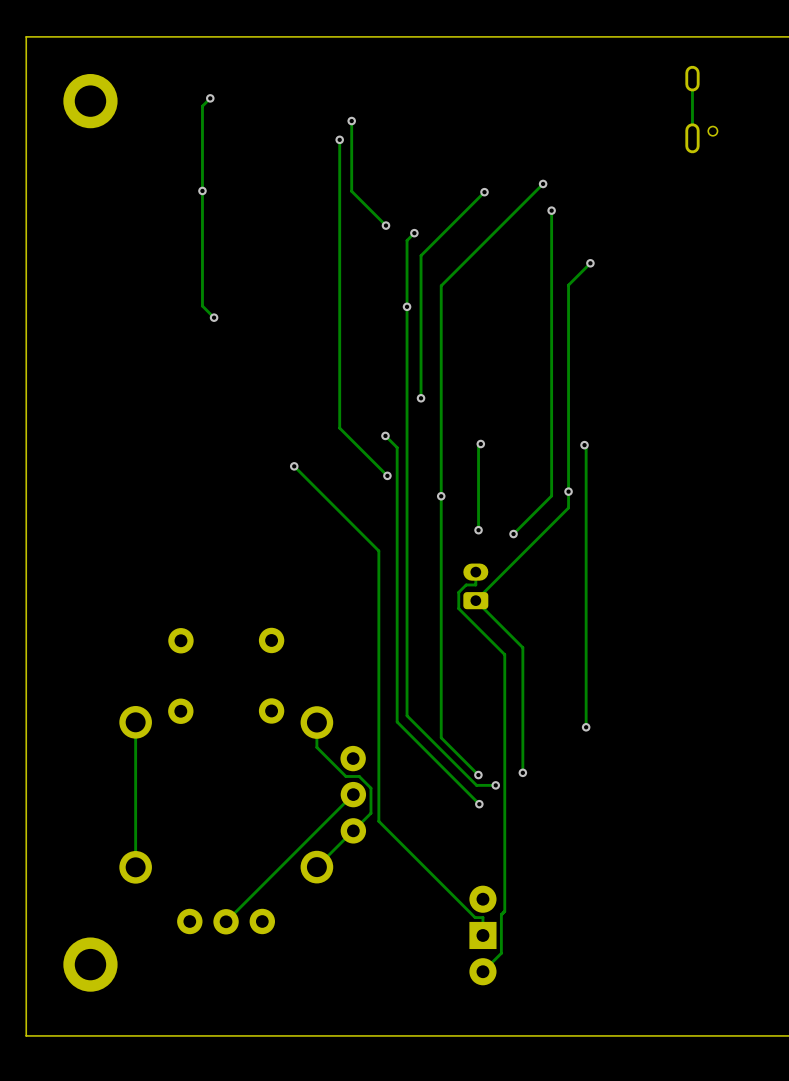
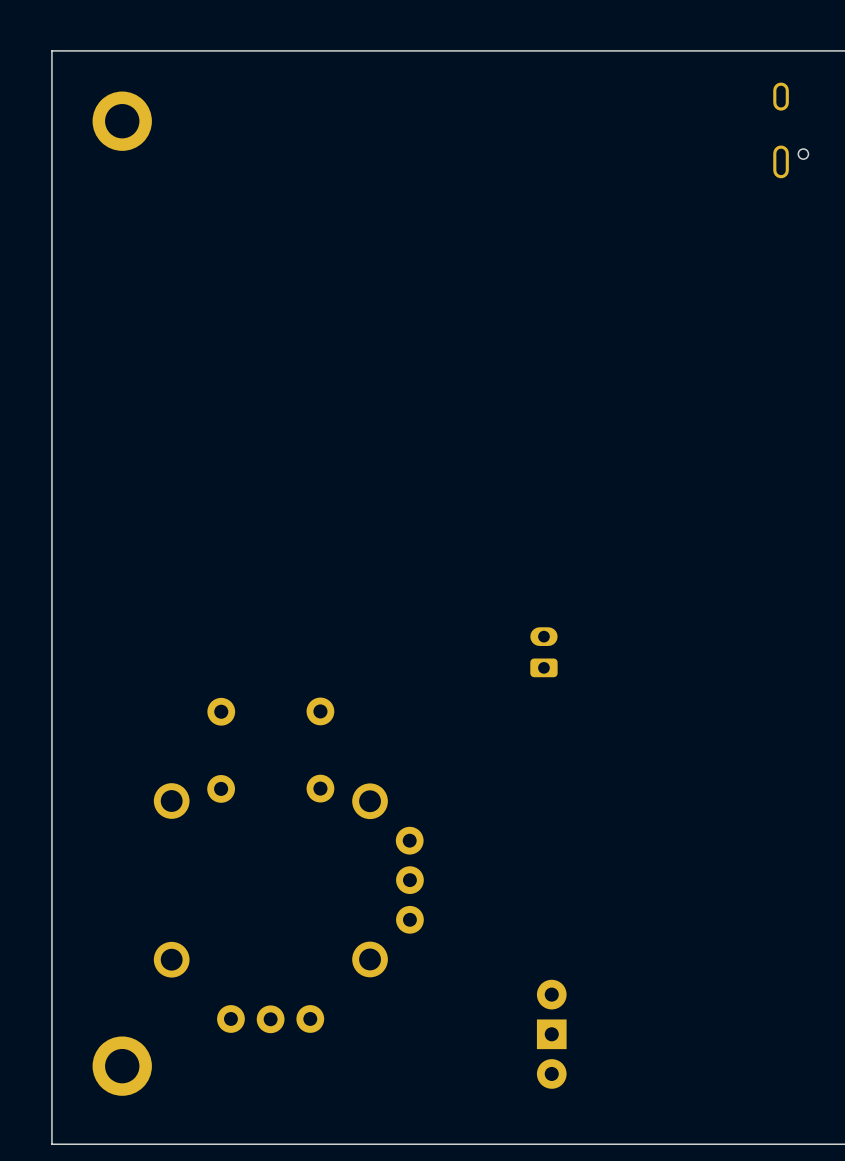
track: (692, 78) (692, 138) -> none
track: (210, 98) (202, 106) (202, 306) (214, 317) -> none
via: (210, 98) -> none
track: (351, 121) (351, 191) (385, 225) -> none
via: (351, 121) -> none
track: (339, 139) (339, 428) (387, 475) -> none
via: (339, 139) -> none
track: (543, 183) (441, 285) (441, 737) (478, 775) -> none
via: (543, 183) -> none
via: (202, 190) -> none
track: (484, 192) (421, 255) (421, 398) -> none
via: (484, 192) -> none
track: (551, 210) (551, 495) (513, 534) -> none
via: (551, 210) -> none
via: (385, 225) -> none
track: (414, 233) (407, 240) (407, 715) (476, 785) (495, 785) -> none
via: (414, 233) -> none
track: (590, 263) (568, 285) (568, 507) (475, 600) (522, 647) (522, 772) -> none
via: (590, 263) -> none
via: (407, 306) -> none
via: (214, 317) -> none
via: (421, 398) -> none
track: (385, 435) (397, 447) (397, 722) (479, 804) -> none
via: (385, 435) -> none
track: (480, 444) (478, 446) (478, 530) -> none
via: (480, 444) -> none
track: (584, 445) (586, 446) (586, 727) -> none
via: (584, 445) -> none
track: (294, 466) (378, 550) (378, 821) (475, 917) (482, 917) (482, 935) -> none
via: (294, 466) -> none
via: (387, 475) -> none
via: (568, 491) -> none
via: (441, 496) -> none
via: (478, 530) -> none
via: (513, 534) -> none
track: (475, 572) (475, 584) (466, 584) (458, 592) (458, 608) (504, 654) (504, 911) (501, 914) (501, 953) (482, 971) -> none
track: (135, 722) (135, 867) -> none
track: (316, 722) (316, 747) (345, 776) (359, 776) (370, 788) (370, 813) (353, 830) -> none
via: (586, 727) -> none
via: (522, 772) -> none
via: (478, 775) -> none
via: (495, 785) -> none
track: (353, 794) (226, 921) -> none
via: (479, 804) -> none
track: (353, 830) (316, 867) -> none

